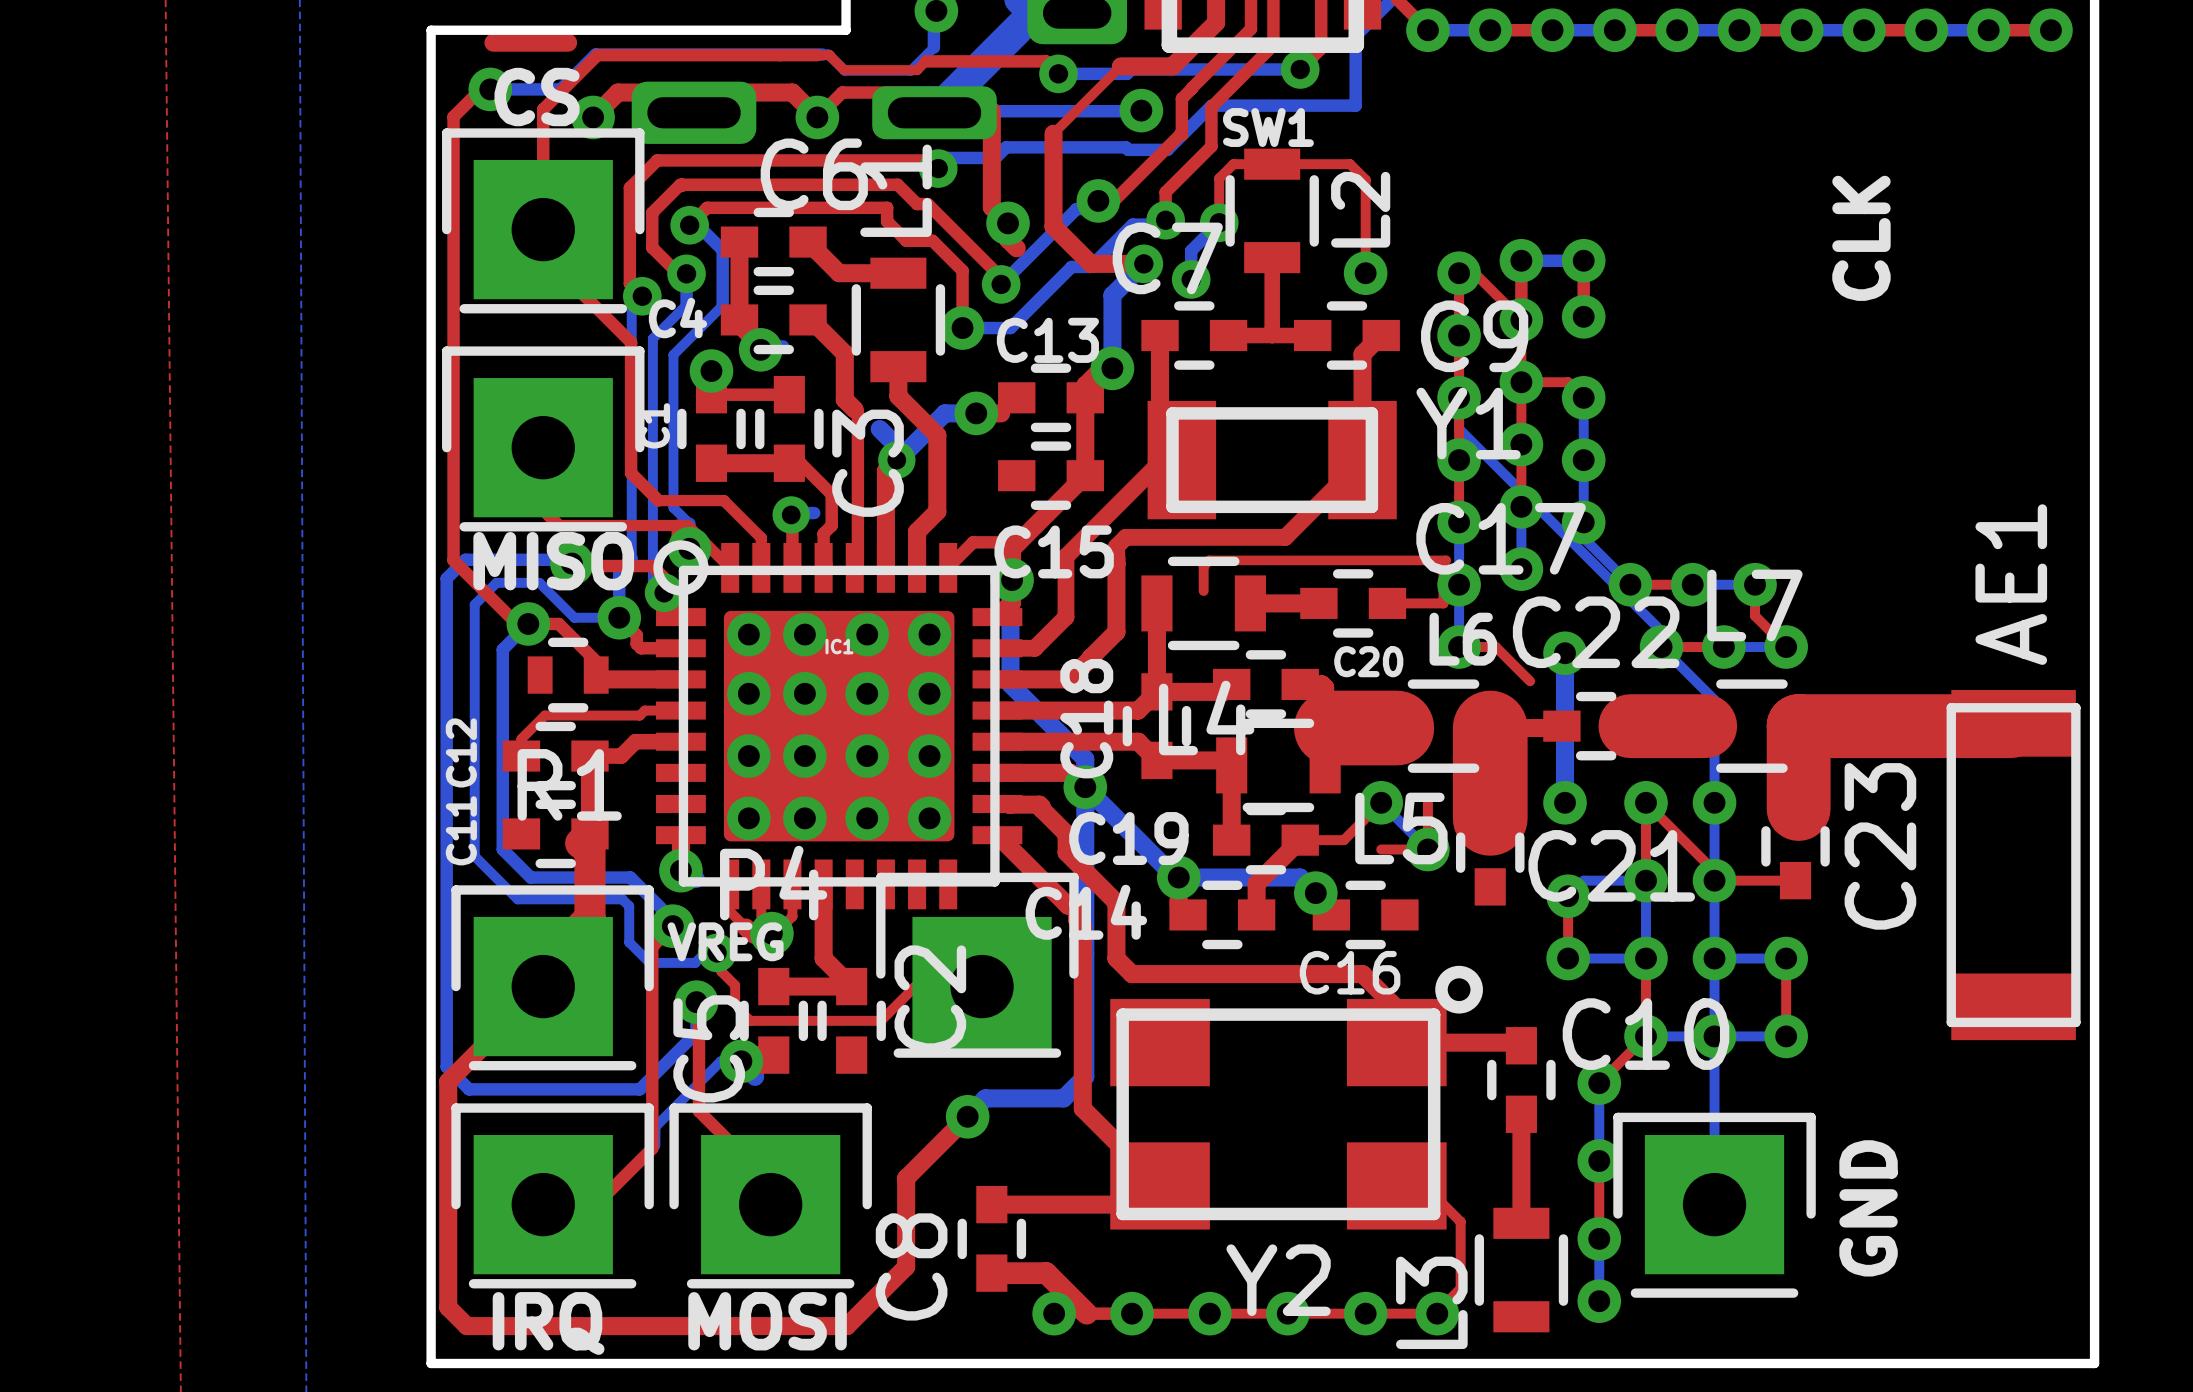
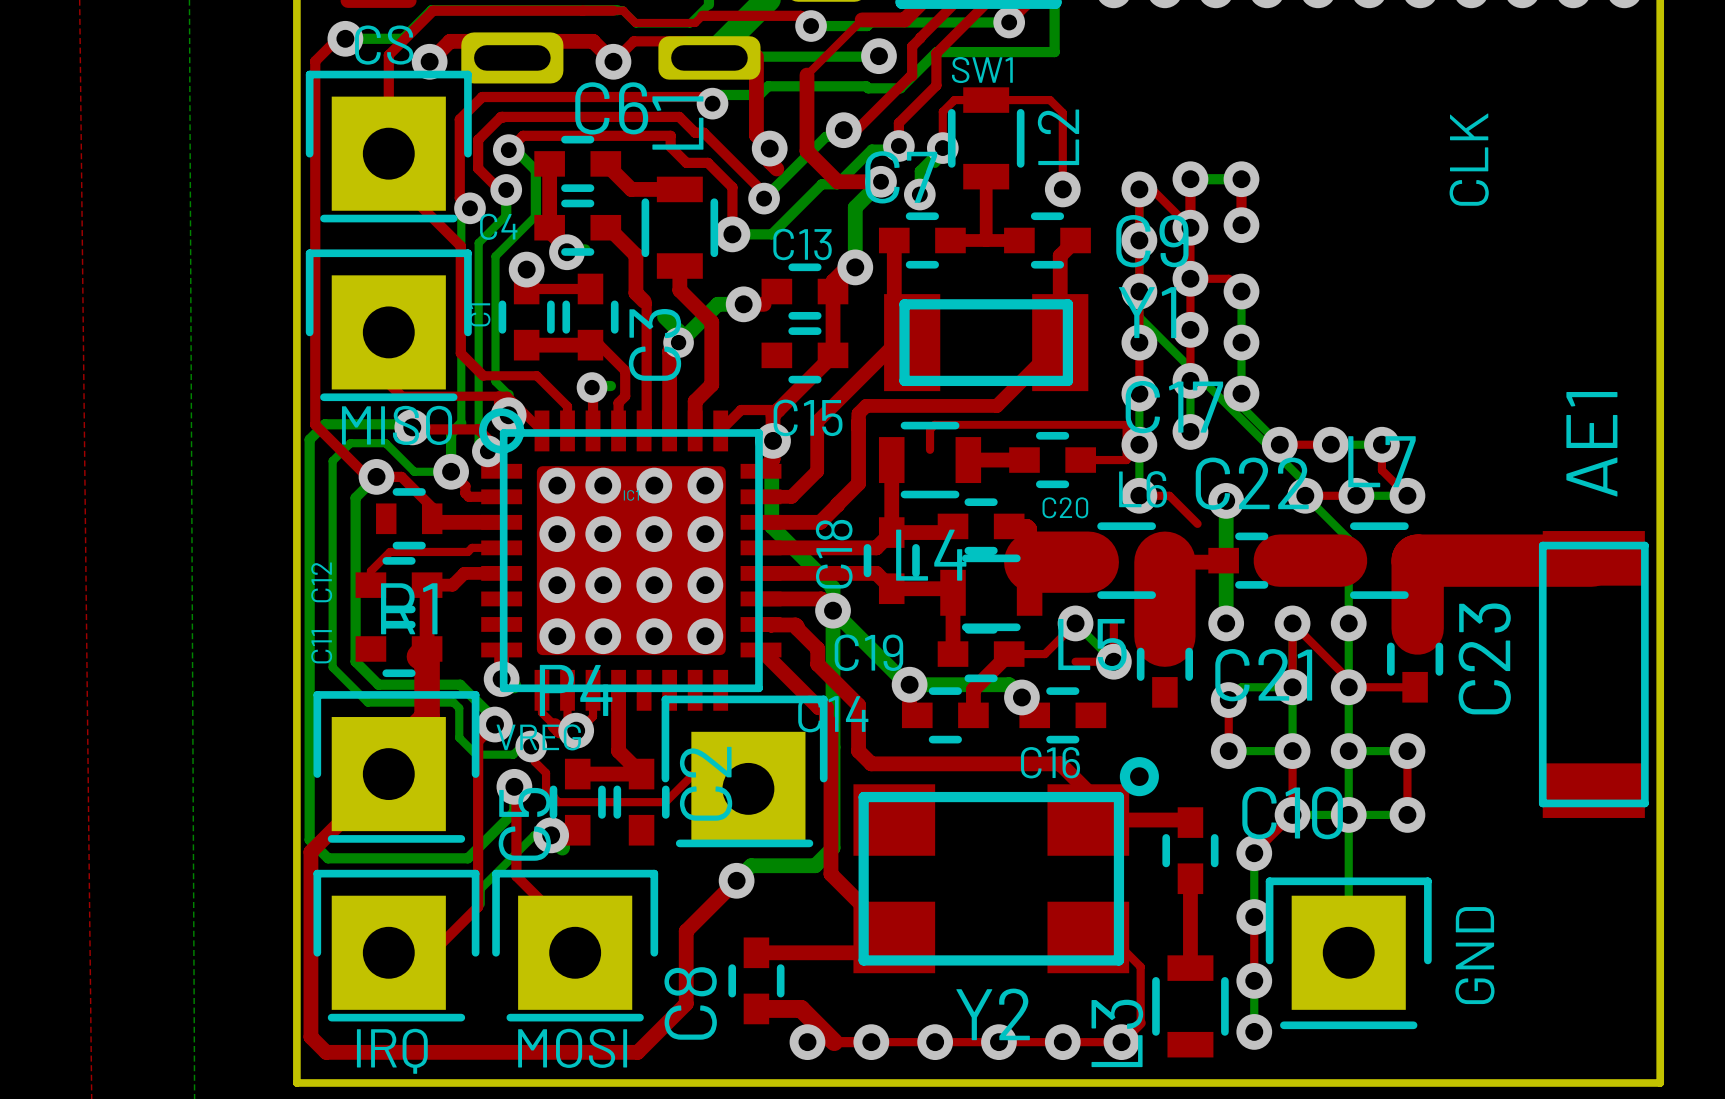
part position: (977, 965) -> (744, 771)

